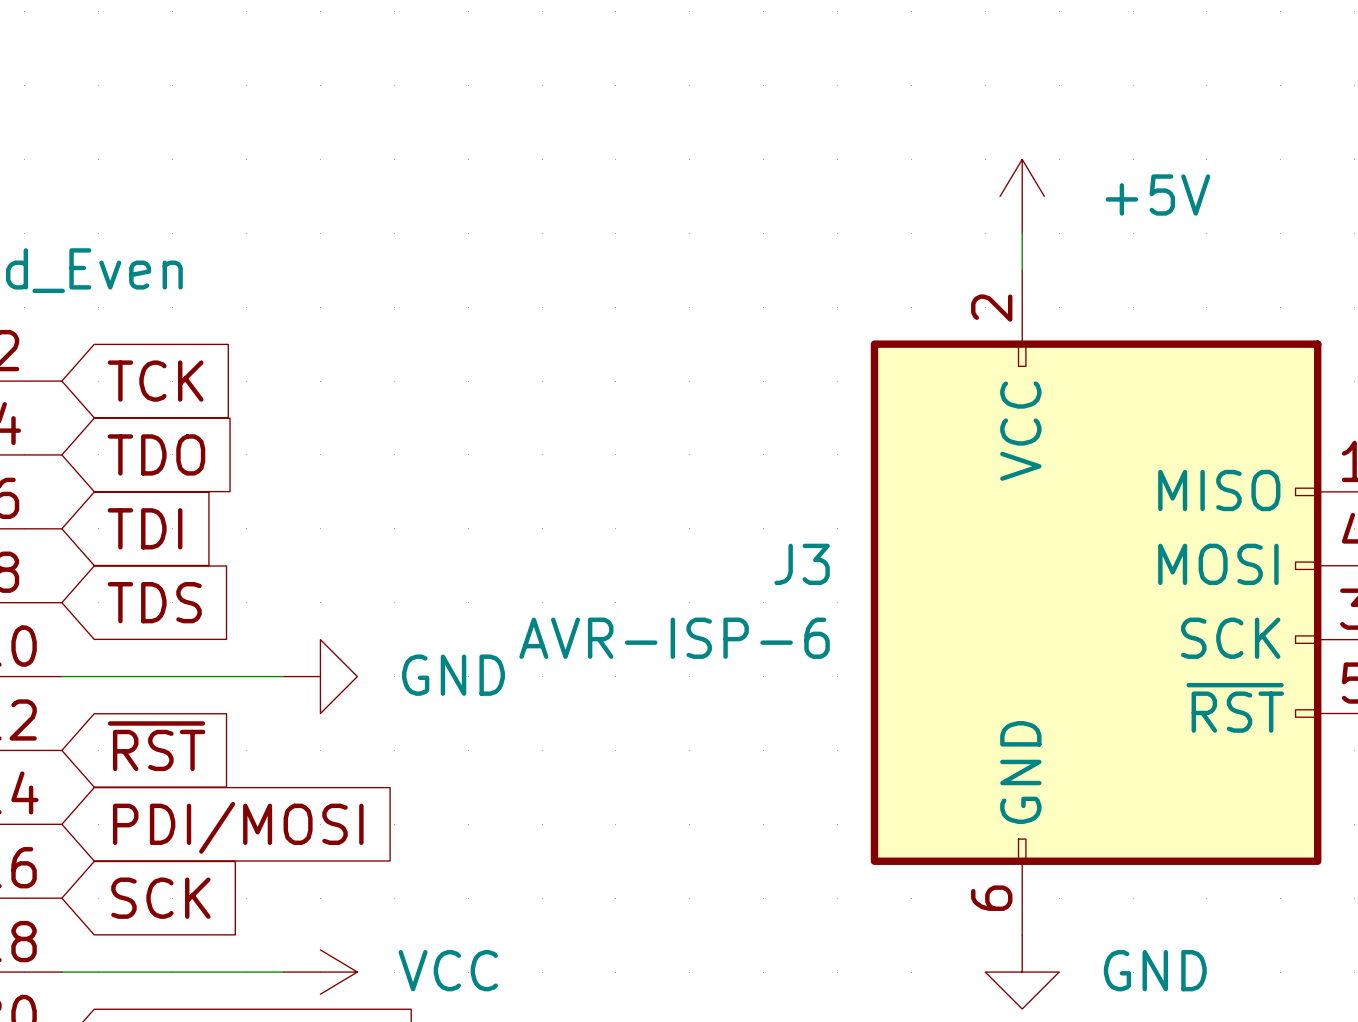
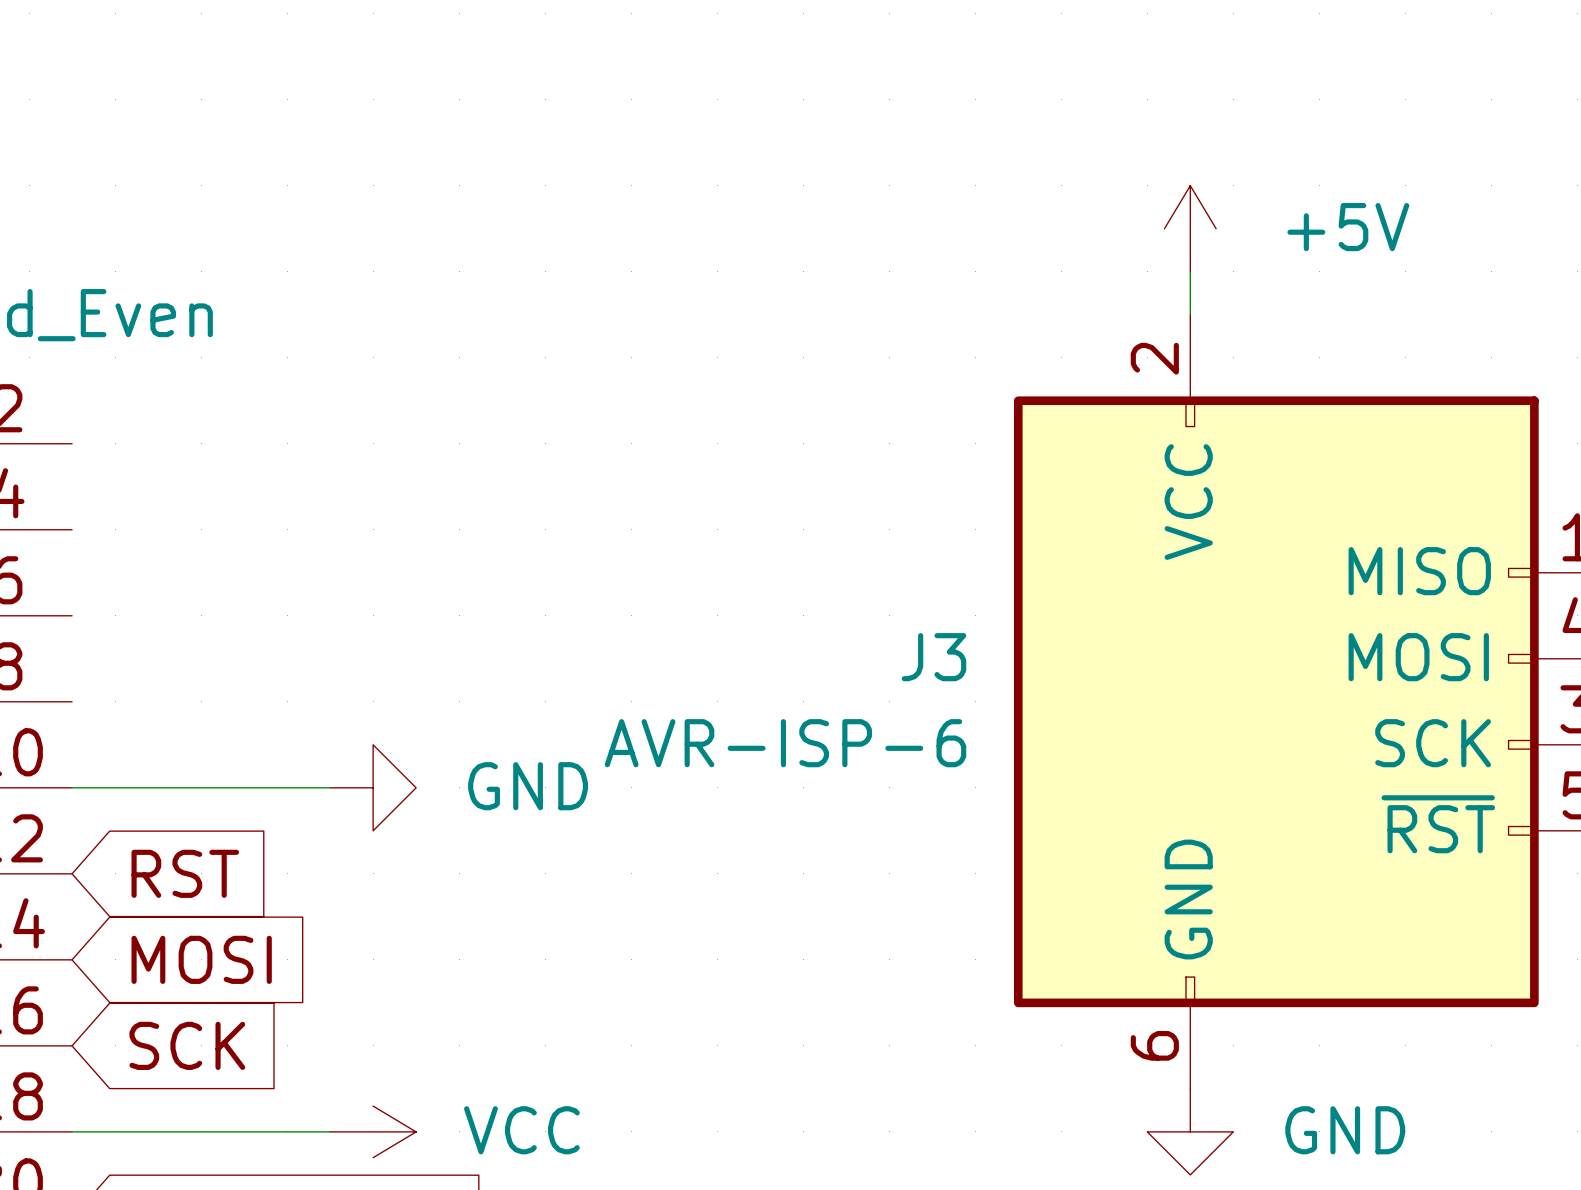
global label: TCK (155, 381) -> none
global label: TDO (156, 454) -> none
global label: TDI (145, 528) -> none
global label: TDS (154, 602) -> none
global label: ~{RST} (156, 746) -> RST (185, 873)
global label: PDI/MOSI (238, 827) -> MOSI (201, 959)

